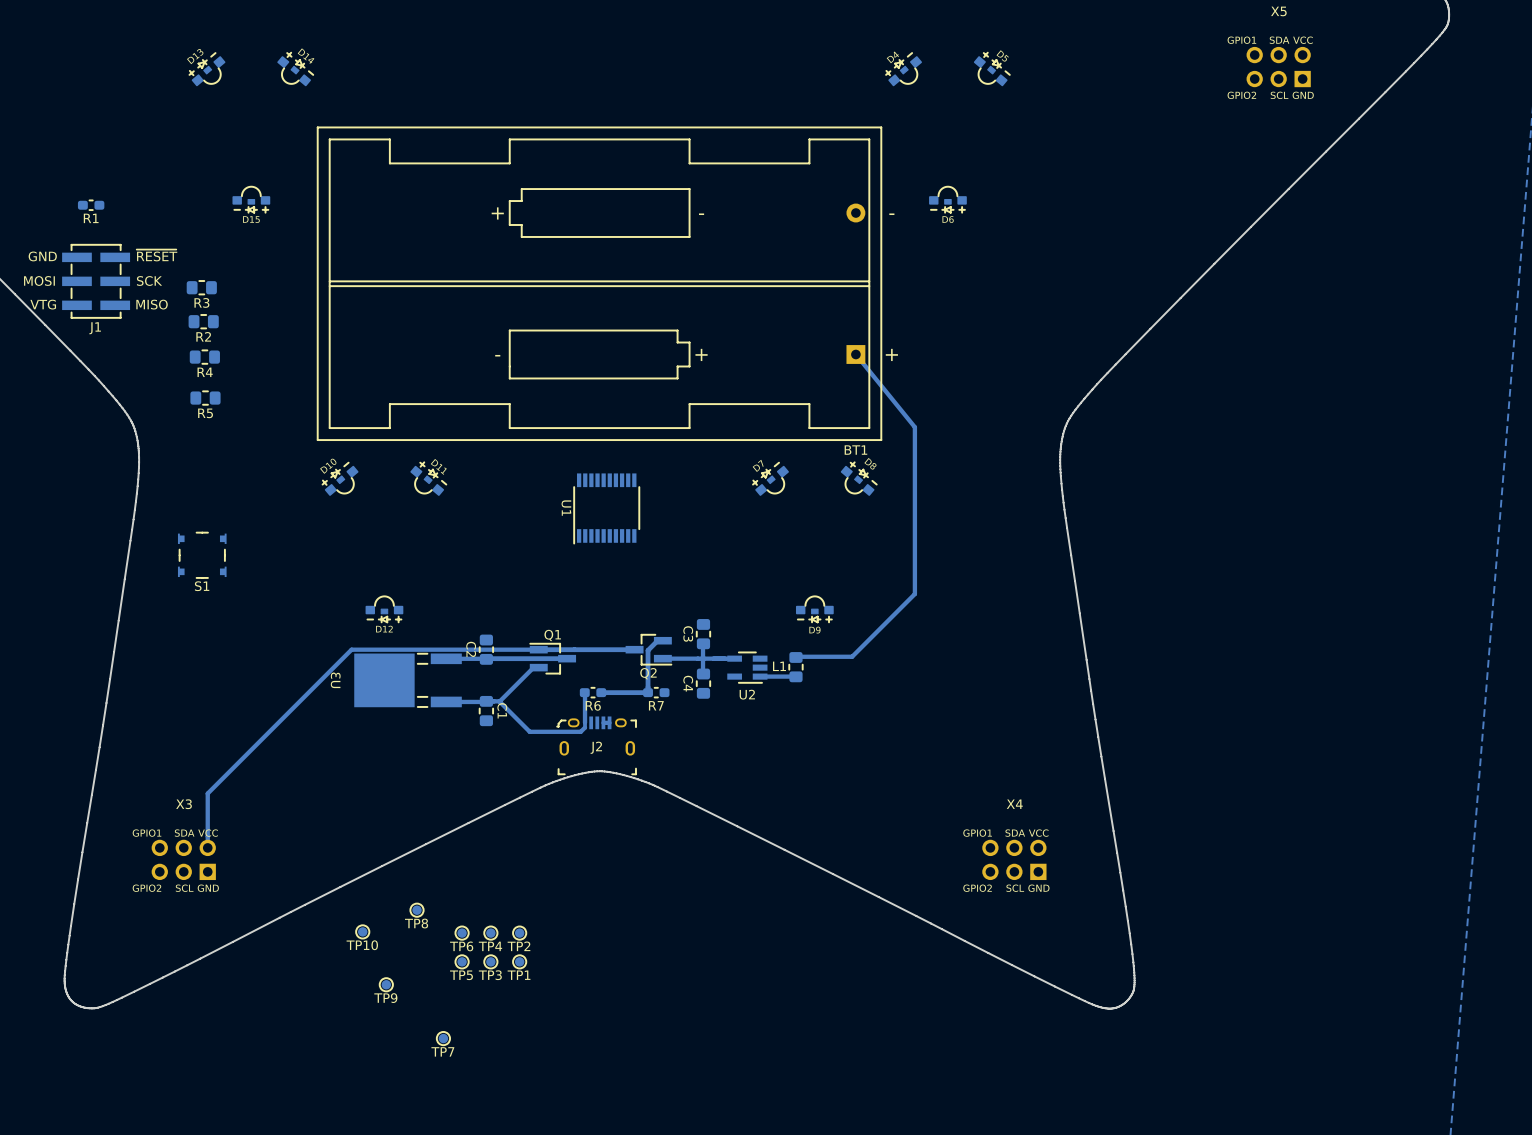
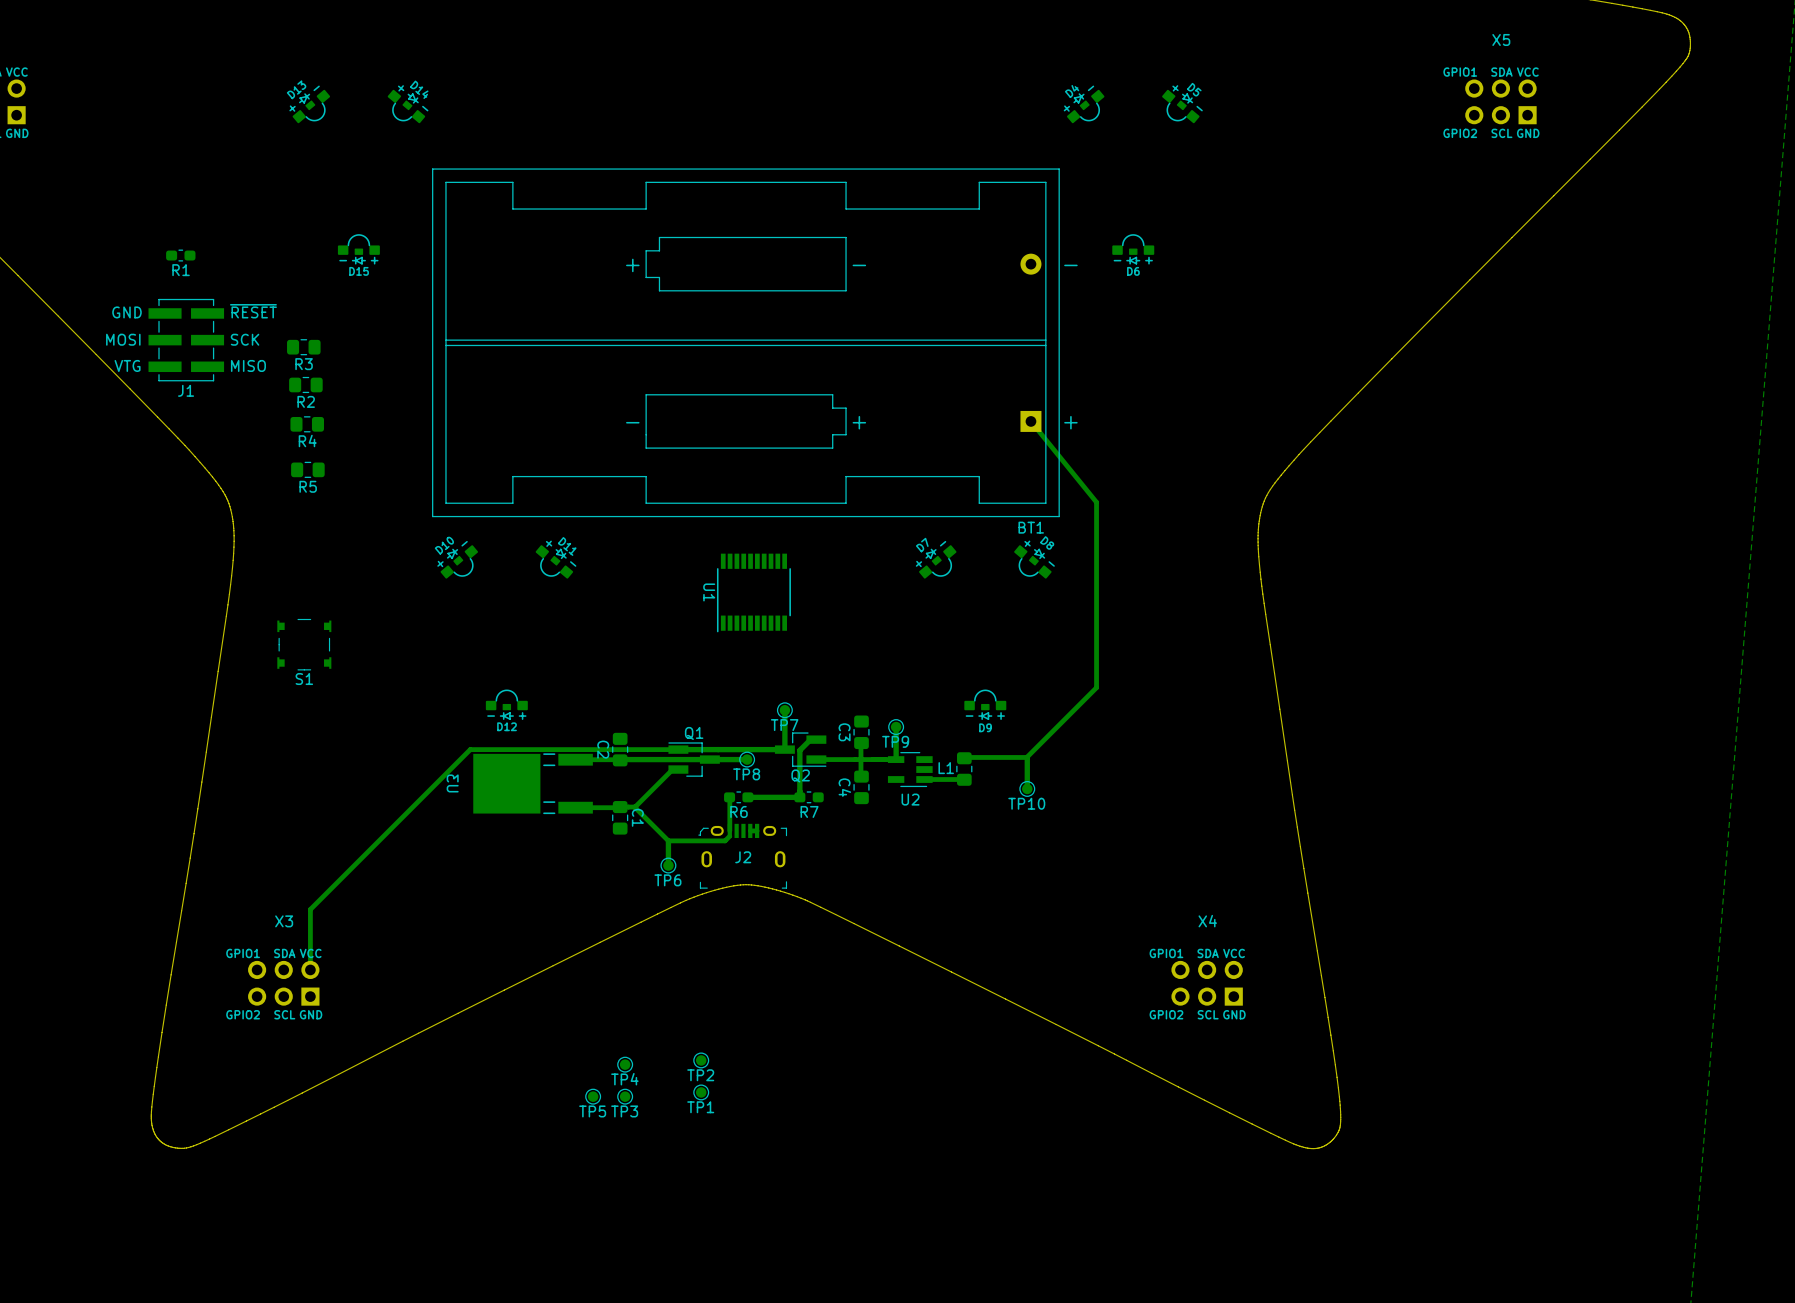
bottom track: none -> (784, 710) (784, 749)
bottom track: none -> (896, 727) (896, 759)
bottom track: none -> (1026, 757) (1027, 788)
bottom track: none -> (747, 759) (709, 759)
bottom track: none -> (668, 840) (668, 865)
TP8 position: (417, 910) -> (747, 759)
TP10 position: (362, 931) -> (1027, 788)
TP6 position: (462, 933) -> (668, 865)
TP2 position: (519, 933) -> (701, 1060)
TP1 position: (519, 961) -> (701, 1092)
TP9 position: (386, 984) -> (896, 727)
TP7 position: (443, 1038) -> (784, 710)

